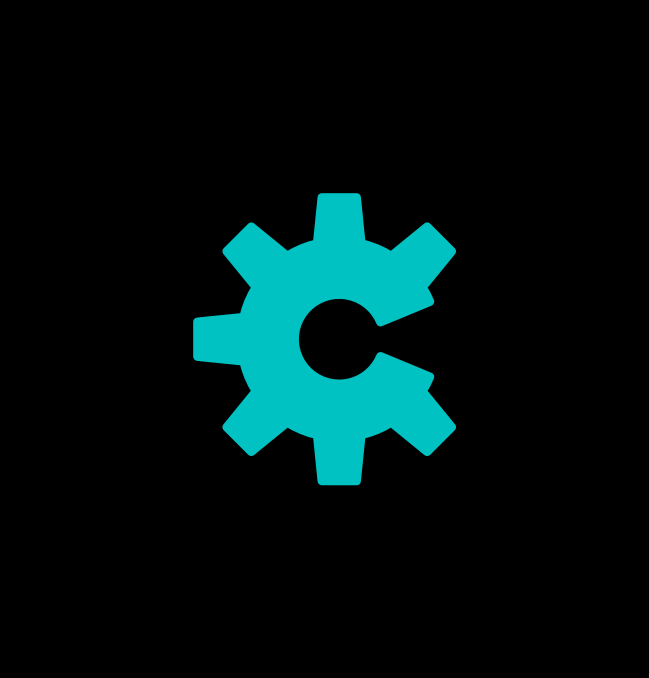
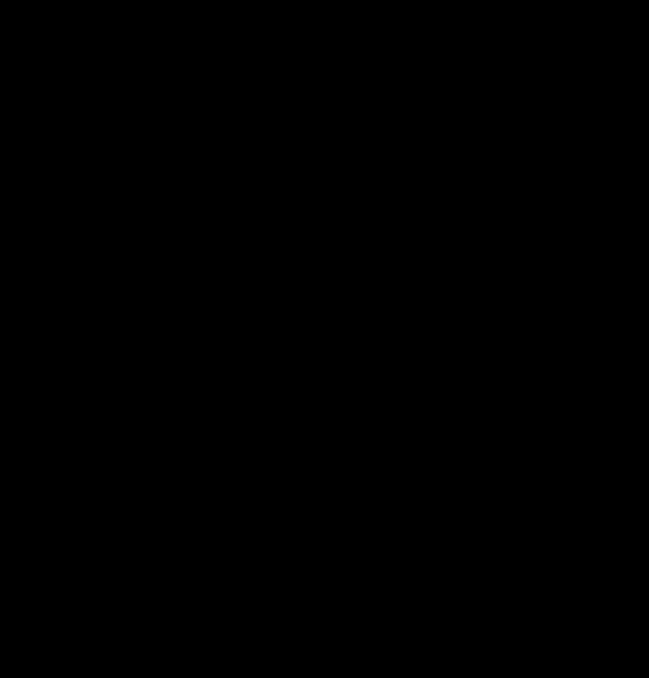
drawing: [193, 193, 457, 486] -> none

